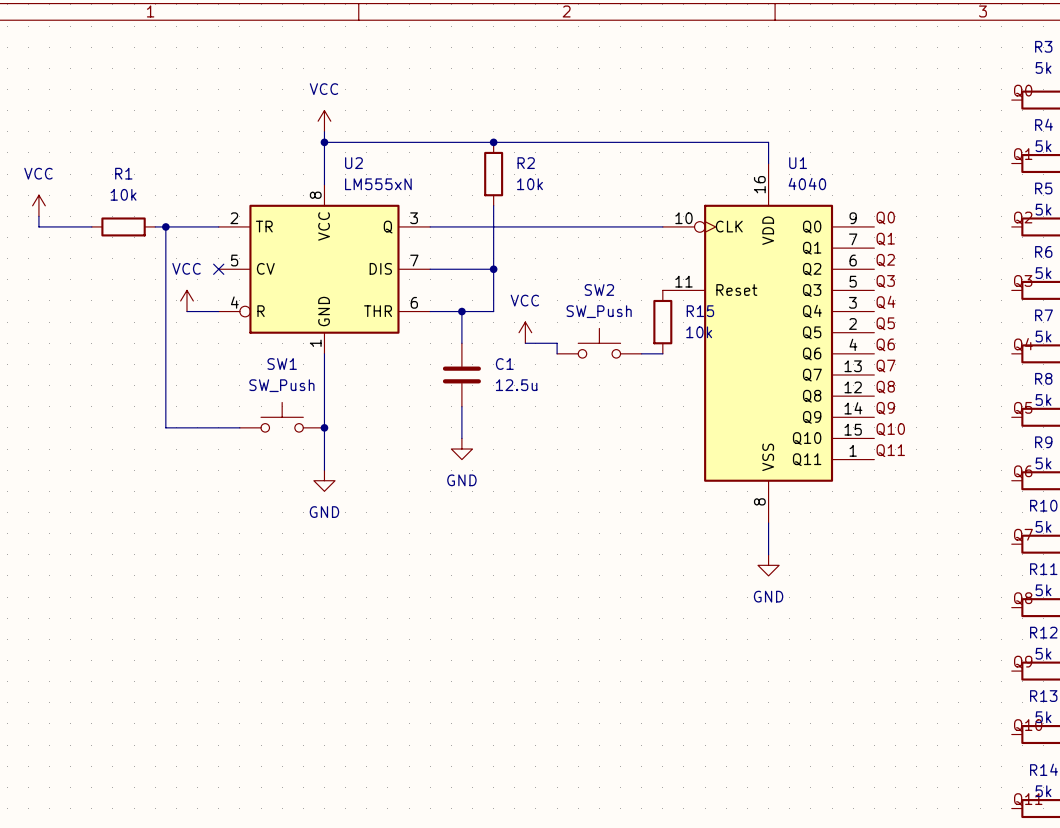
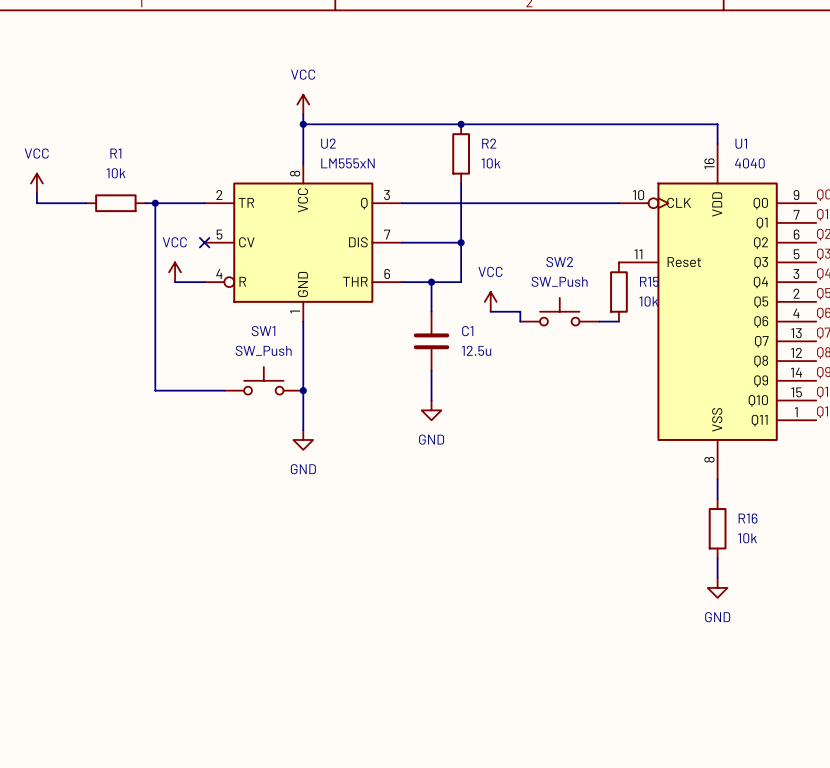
power symbol position: GND (768, 565) -> GND (717, 587)
R16: none -> 10k (717, 528)
wire: none -> (717, 558) (717, 578)

